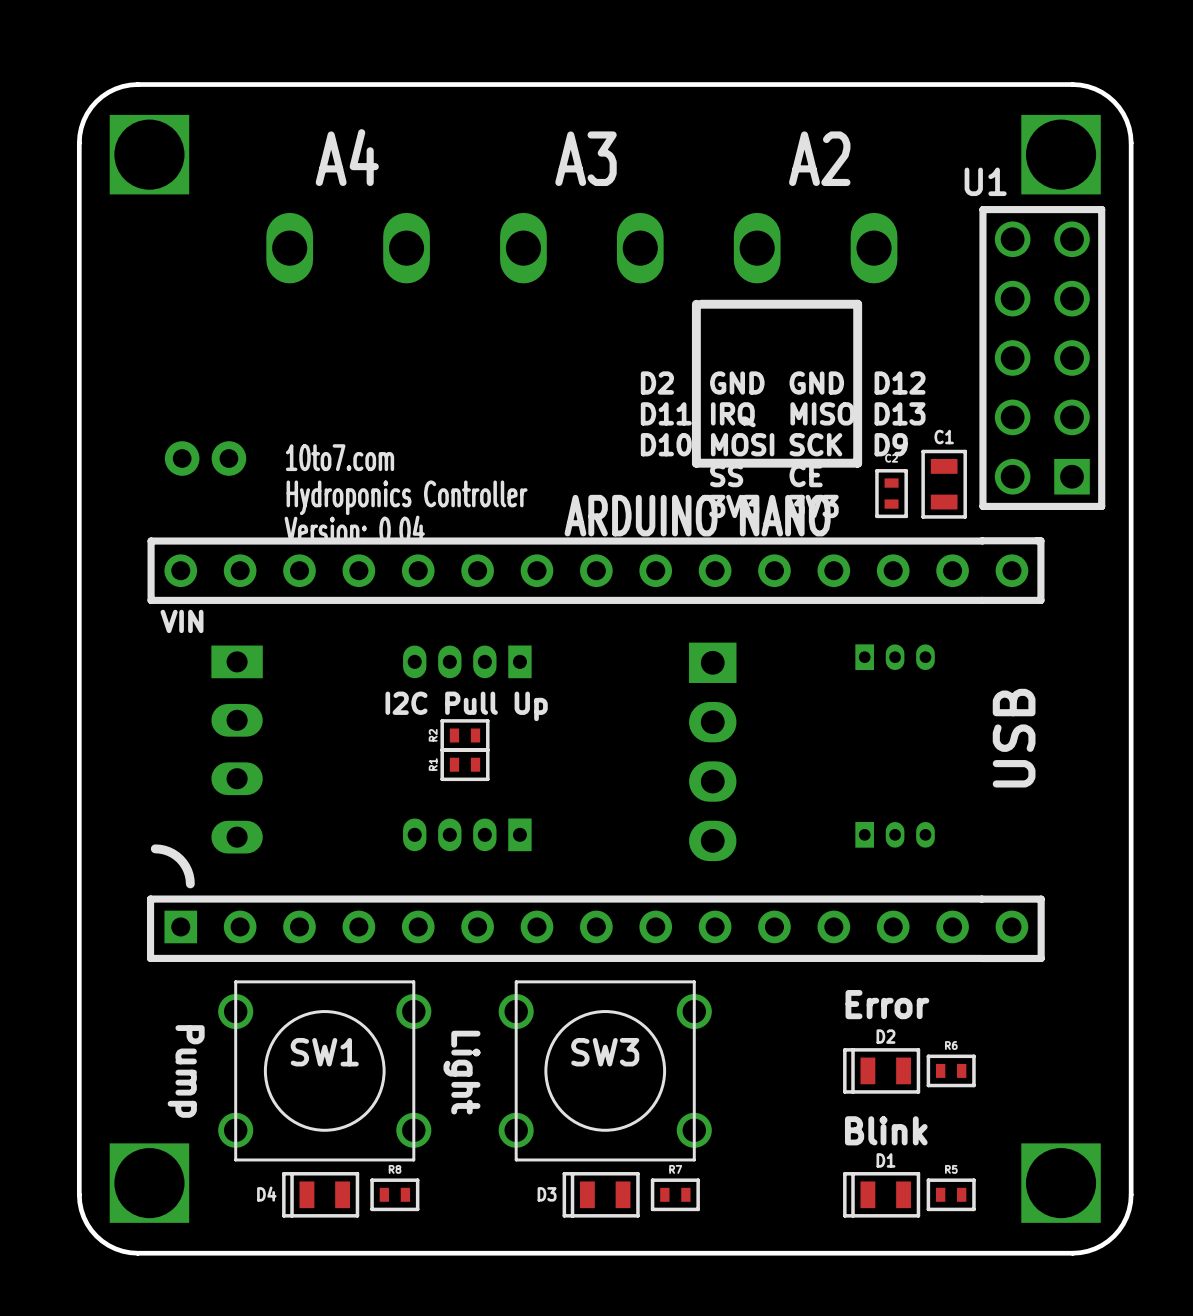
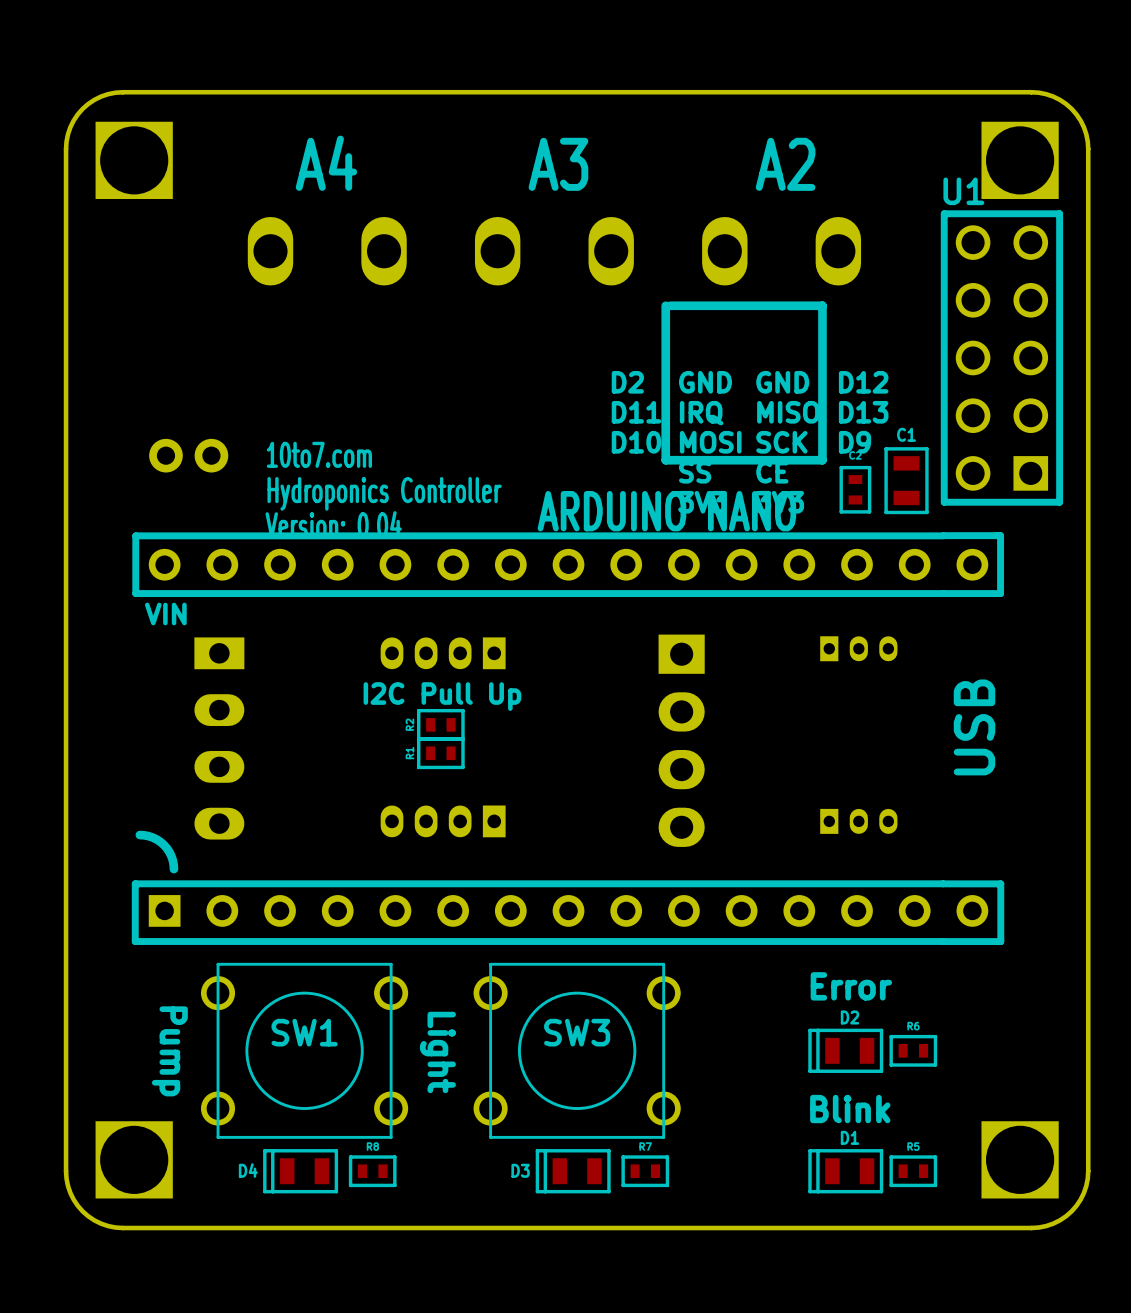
U1 name position: U1 (985, 181) -> U1 (963, 191)

